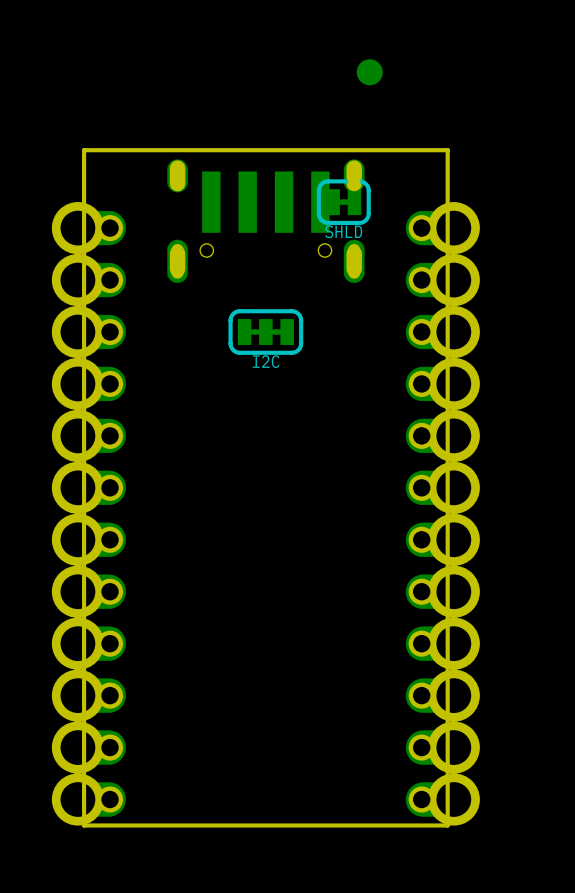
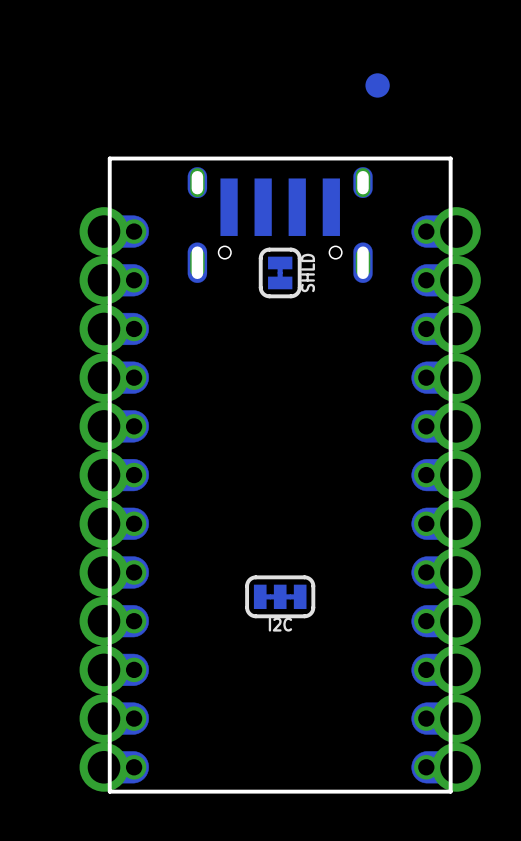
SHLD rotation: 0° (343, 202) -> 90° clockwise (280, 272)
SHLD position: (343, 202) -> (280, 272)
SHLD name position: SHLD (343, 231) -> SHLD (307, 272)
I2C position: (265, 332) -> (280, 596)

